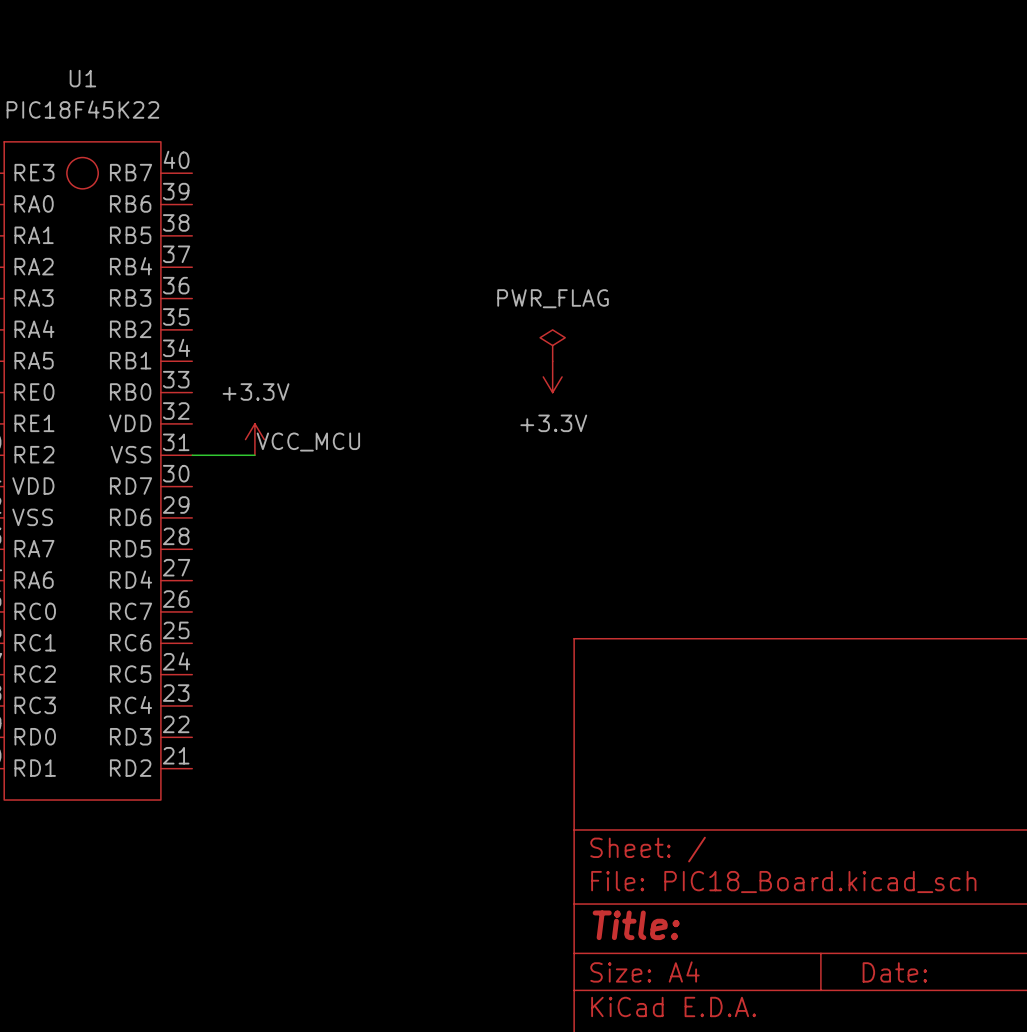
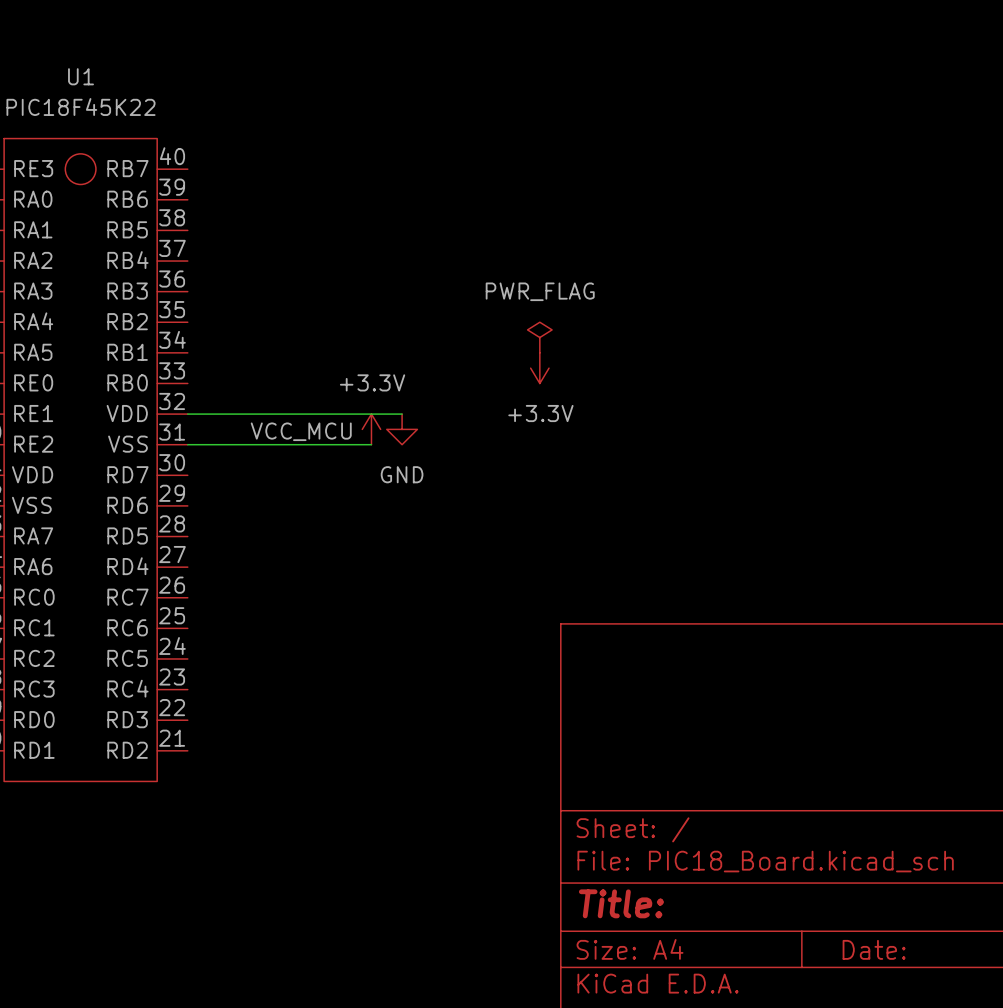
wire: none -> (187, 414) (402, 414)
power symbol position: +3.3V (254, 439) -> +3.3V (371, 429)
power symbol: none -> GND (402, 429)
wire: none -> (249, 444) (371, 444)

